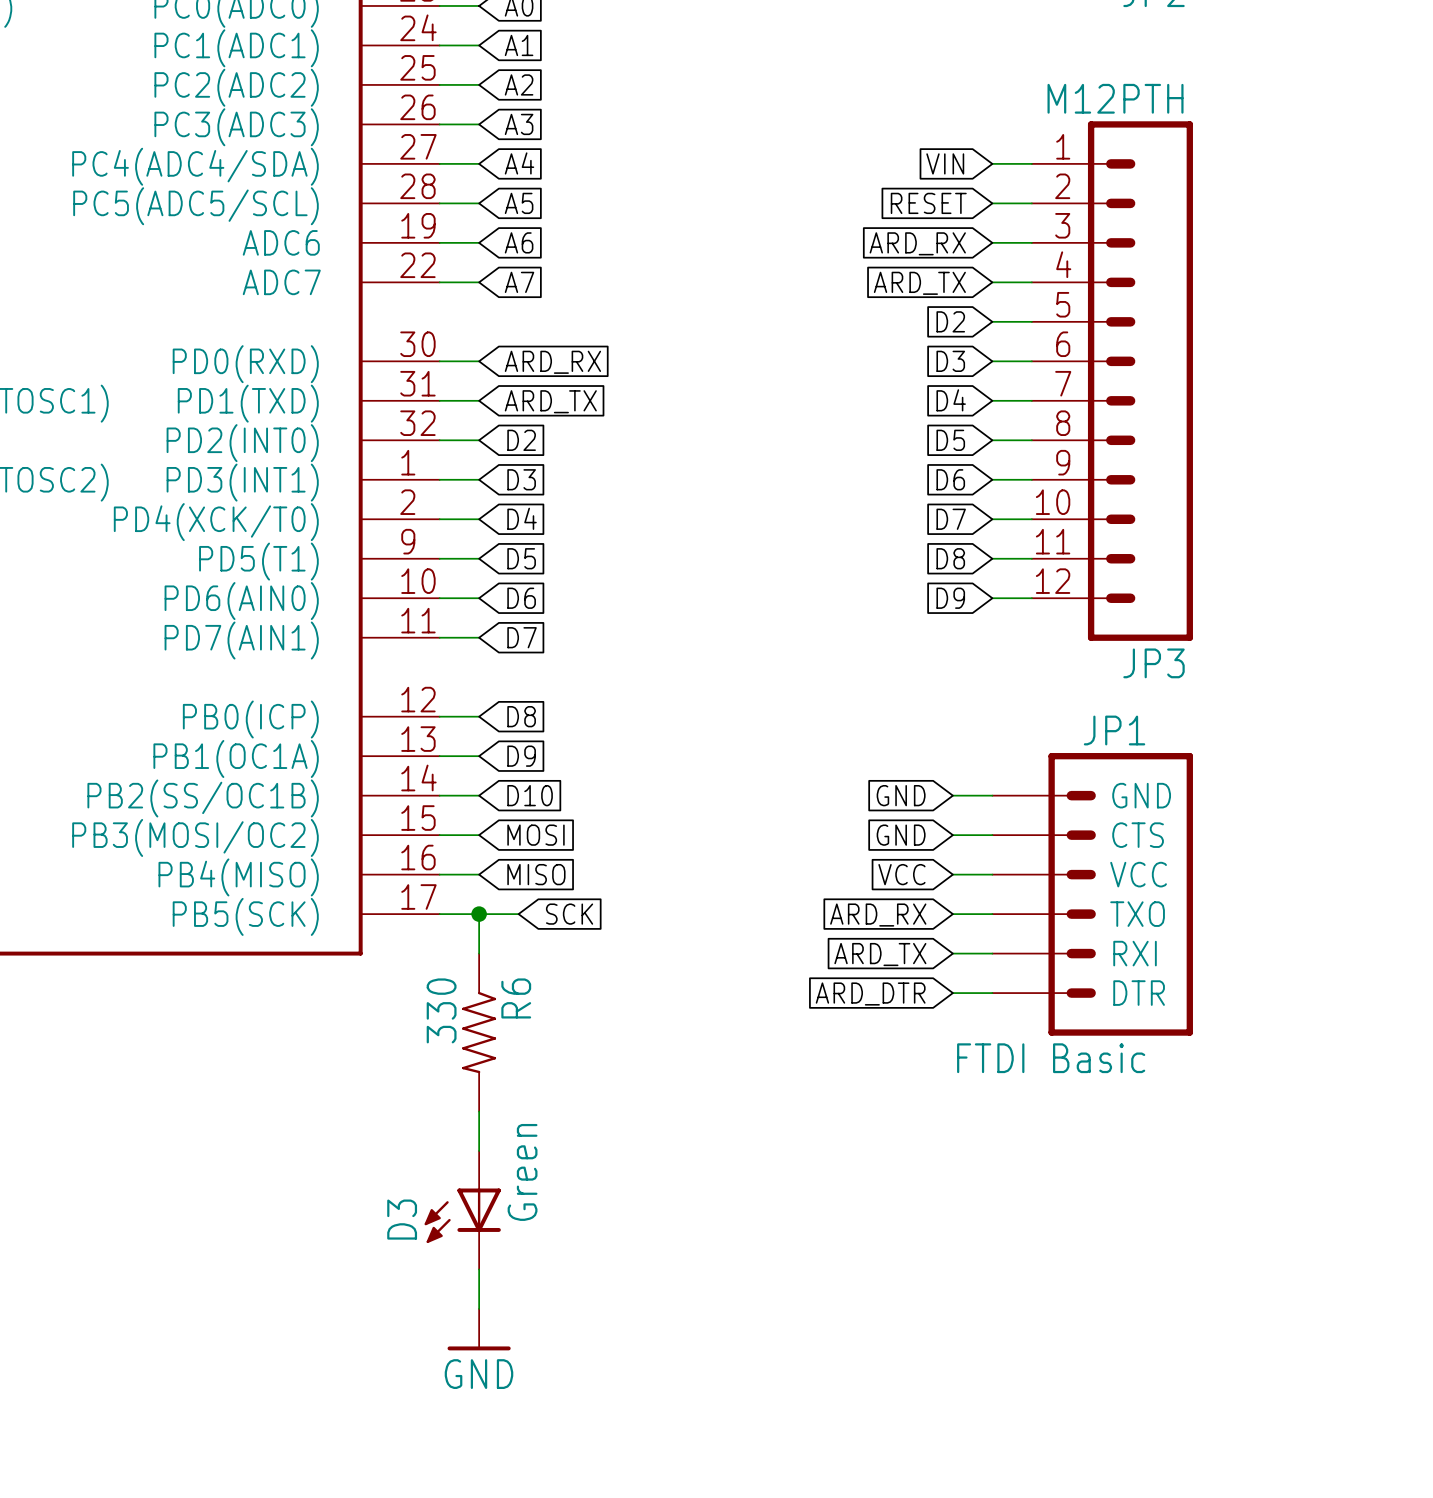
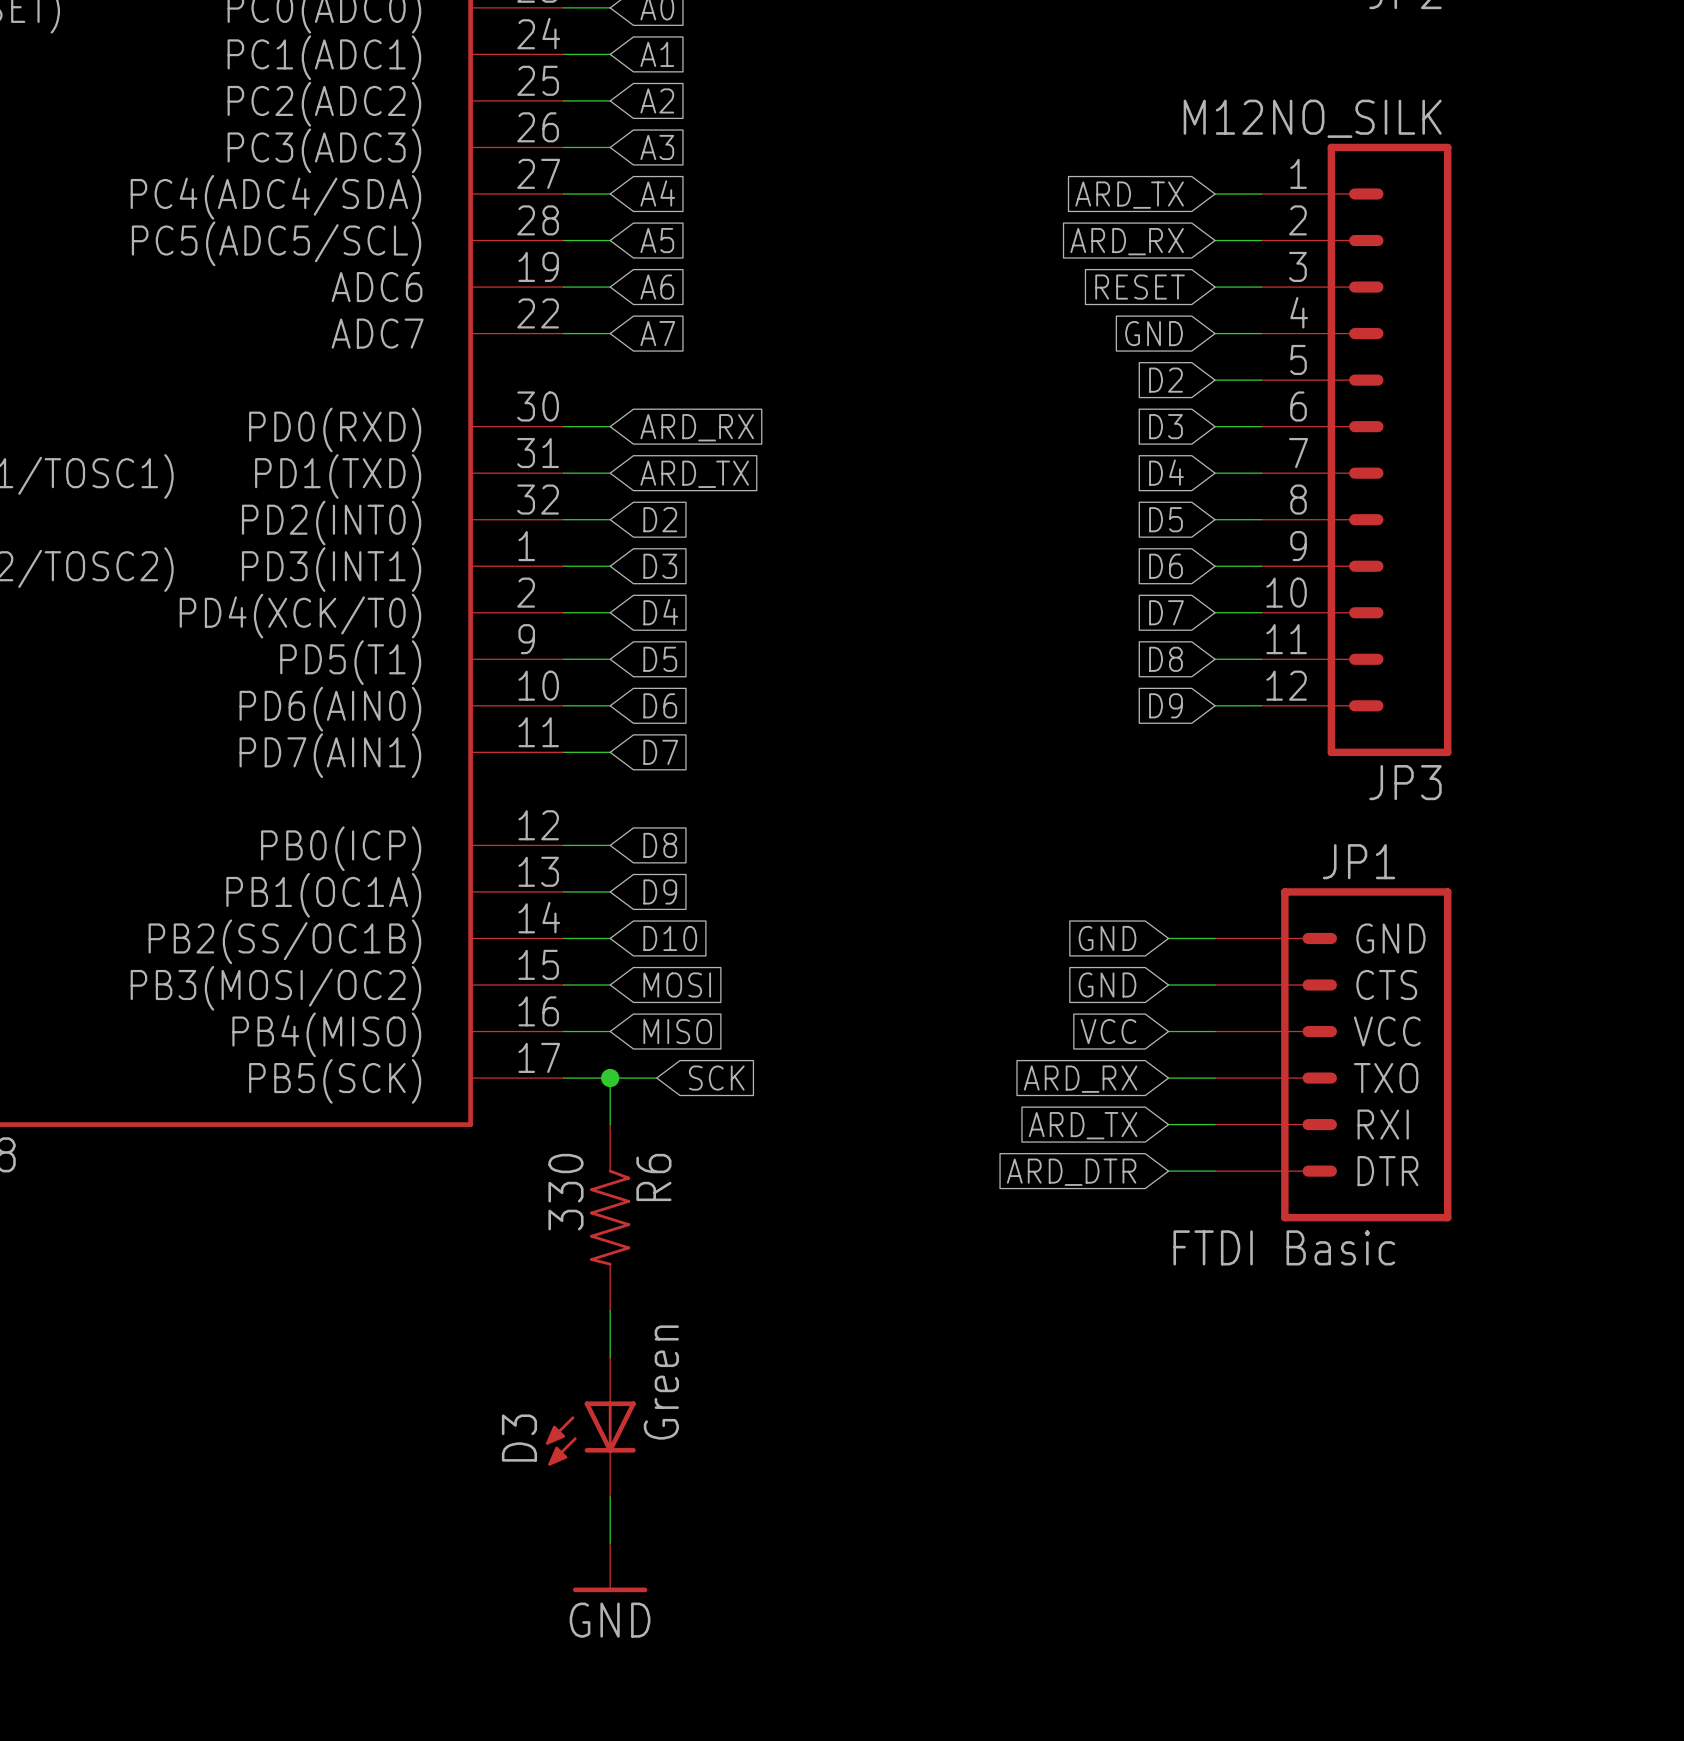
JP3 value: M12PTH (1115, 98) -> M12NO_SILK (1312, 118)
global label: VIN (945, 163) -> ARD_TX (1129, 195)
global label: RESET (928, 203) -> ARD_RX (1127, 241)
global label: ARD_RX (917, 243) -> RESET (1140, 287)
global label: ARD_TX (919, 283) -> GND (1154, 333)

